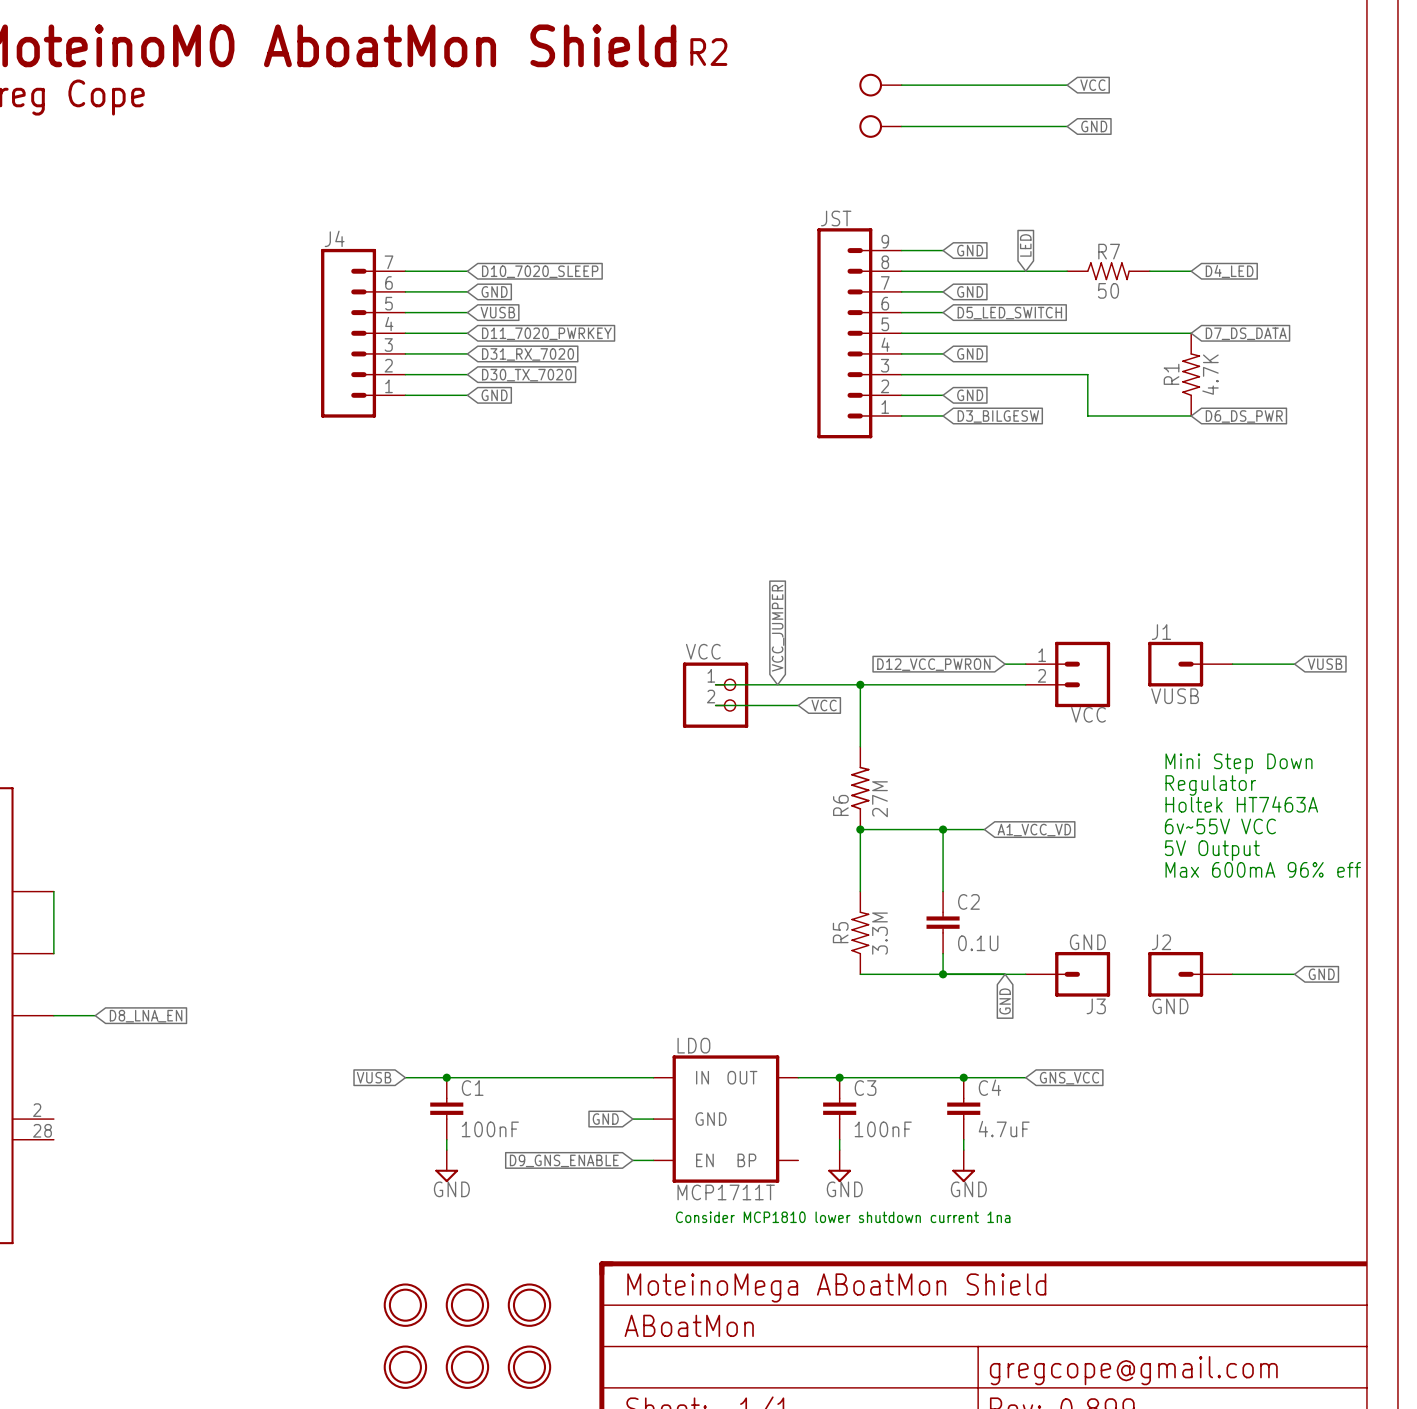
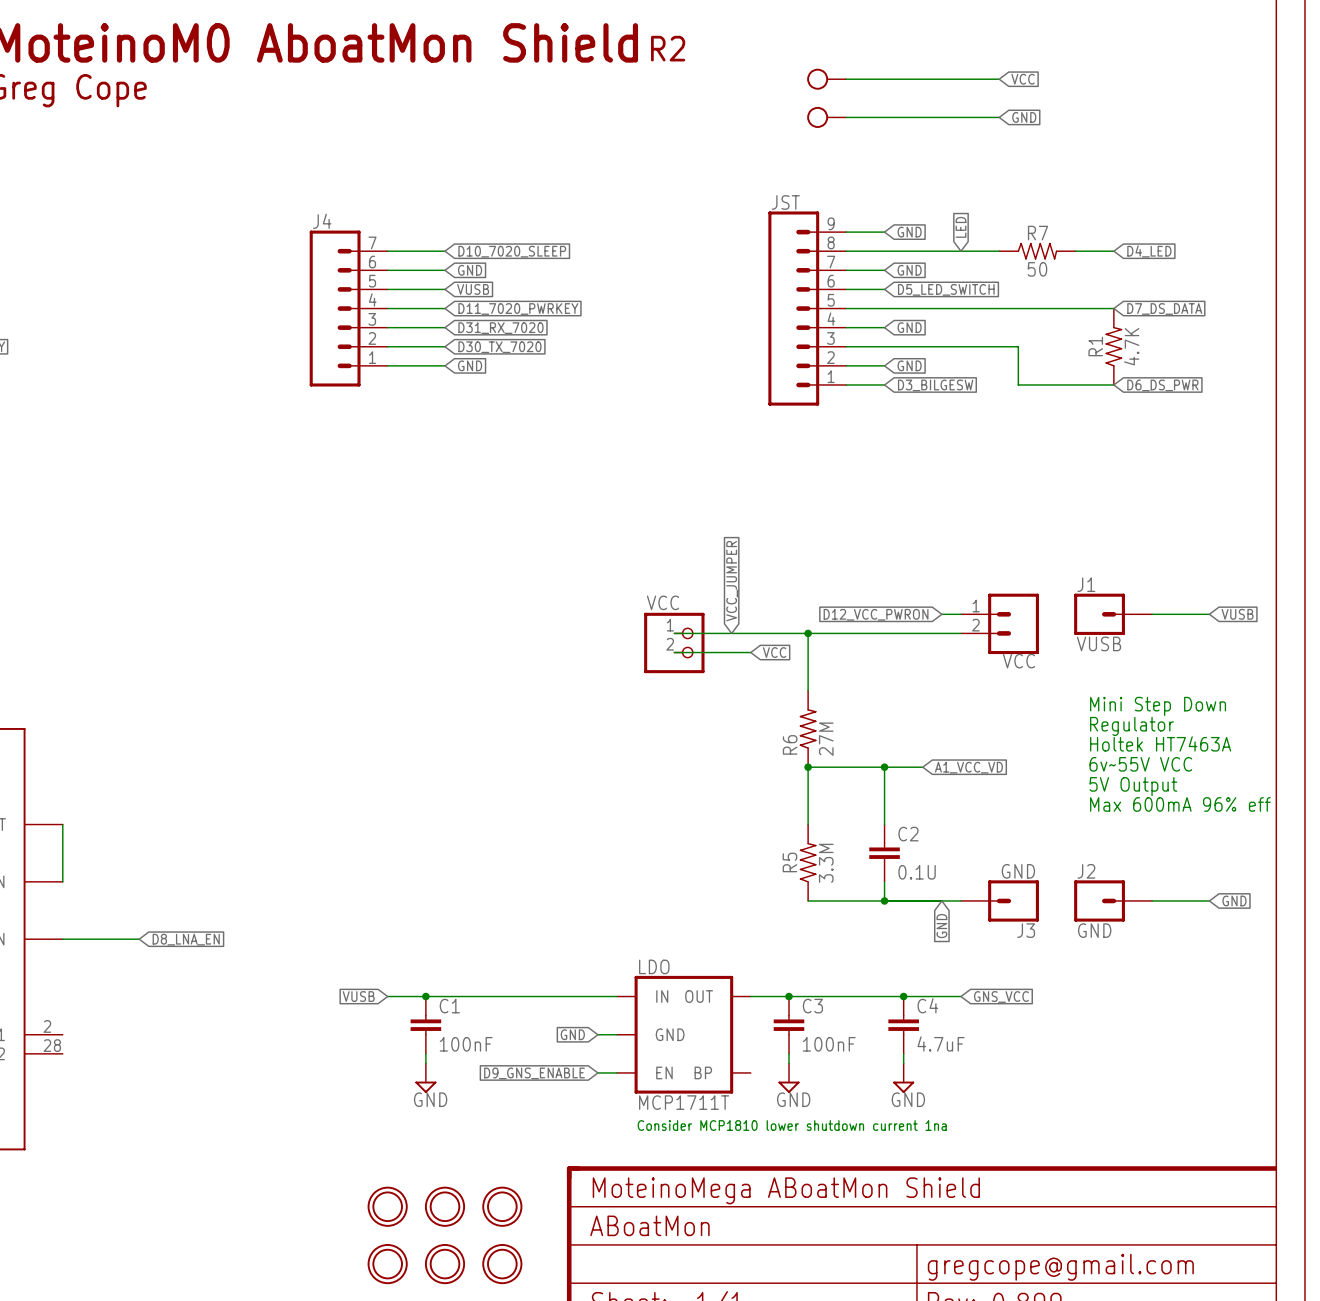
wire: none -> (101, 939) (139, 939)
global label position: D8_LNA_EN (146, 1016) -> D8_LNA_EN (186, 939)

